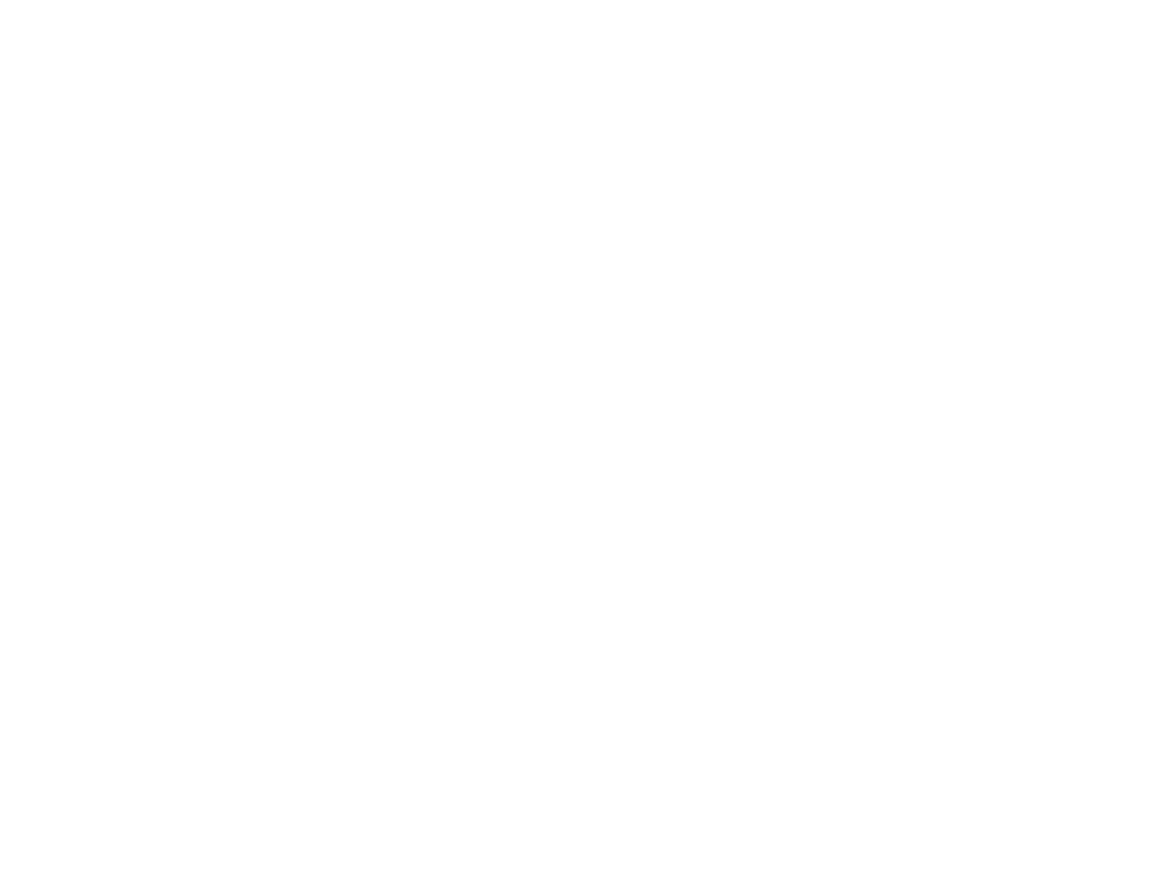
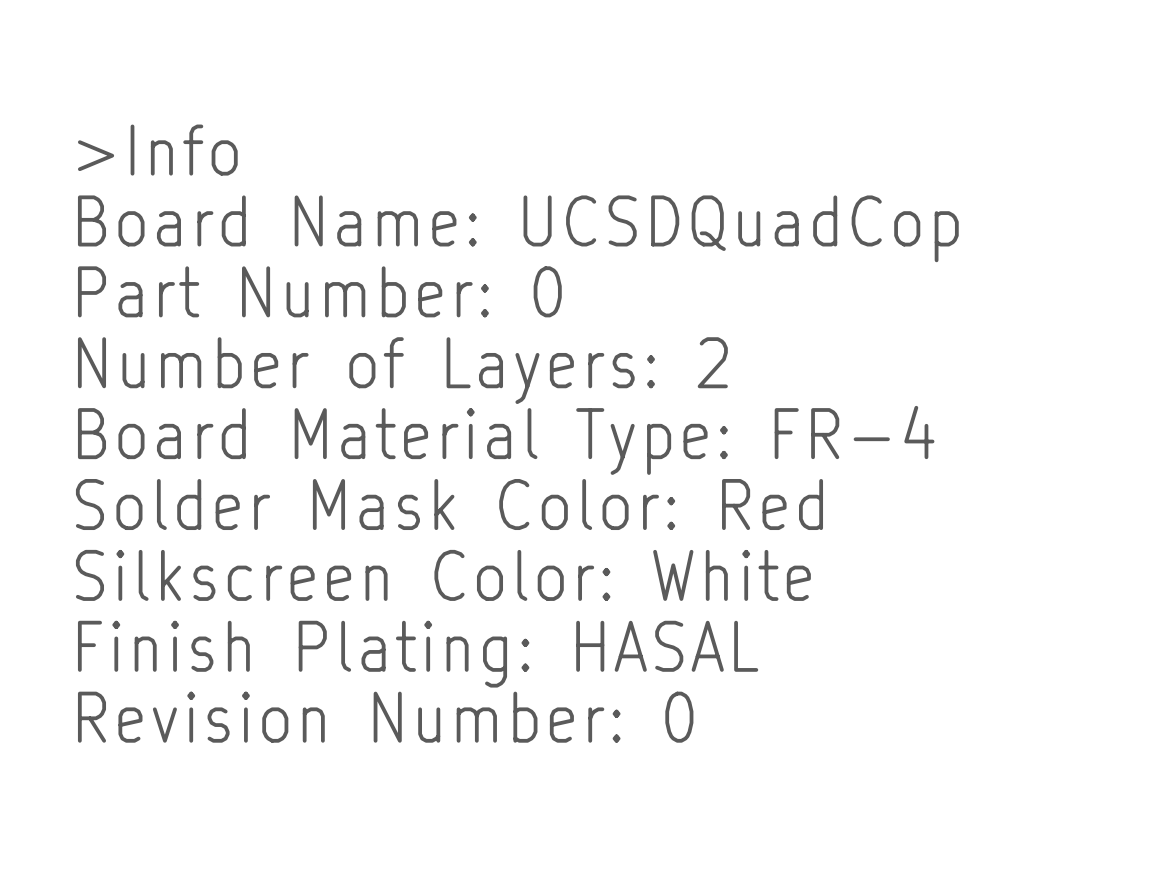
text: none -> >Info (157, 150)
text: none -> Board Name: UCSDQuadCop (518, 228)
text: none -> Part Number: 0 (319, 291)
text: none -> Number of Layers: 2 (402, 370)
text: none -> Board Material Type: FR-4 (506, 440)
text: none -> Solder Mask Color: Red (449, 504)
text: none -> Silkscreen Color: White (443, 575)
text: none -> Finish Plating: HASAL (418, 654)
text: none -> Revision Number: 0 (385, 717)

